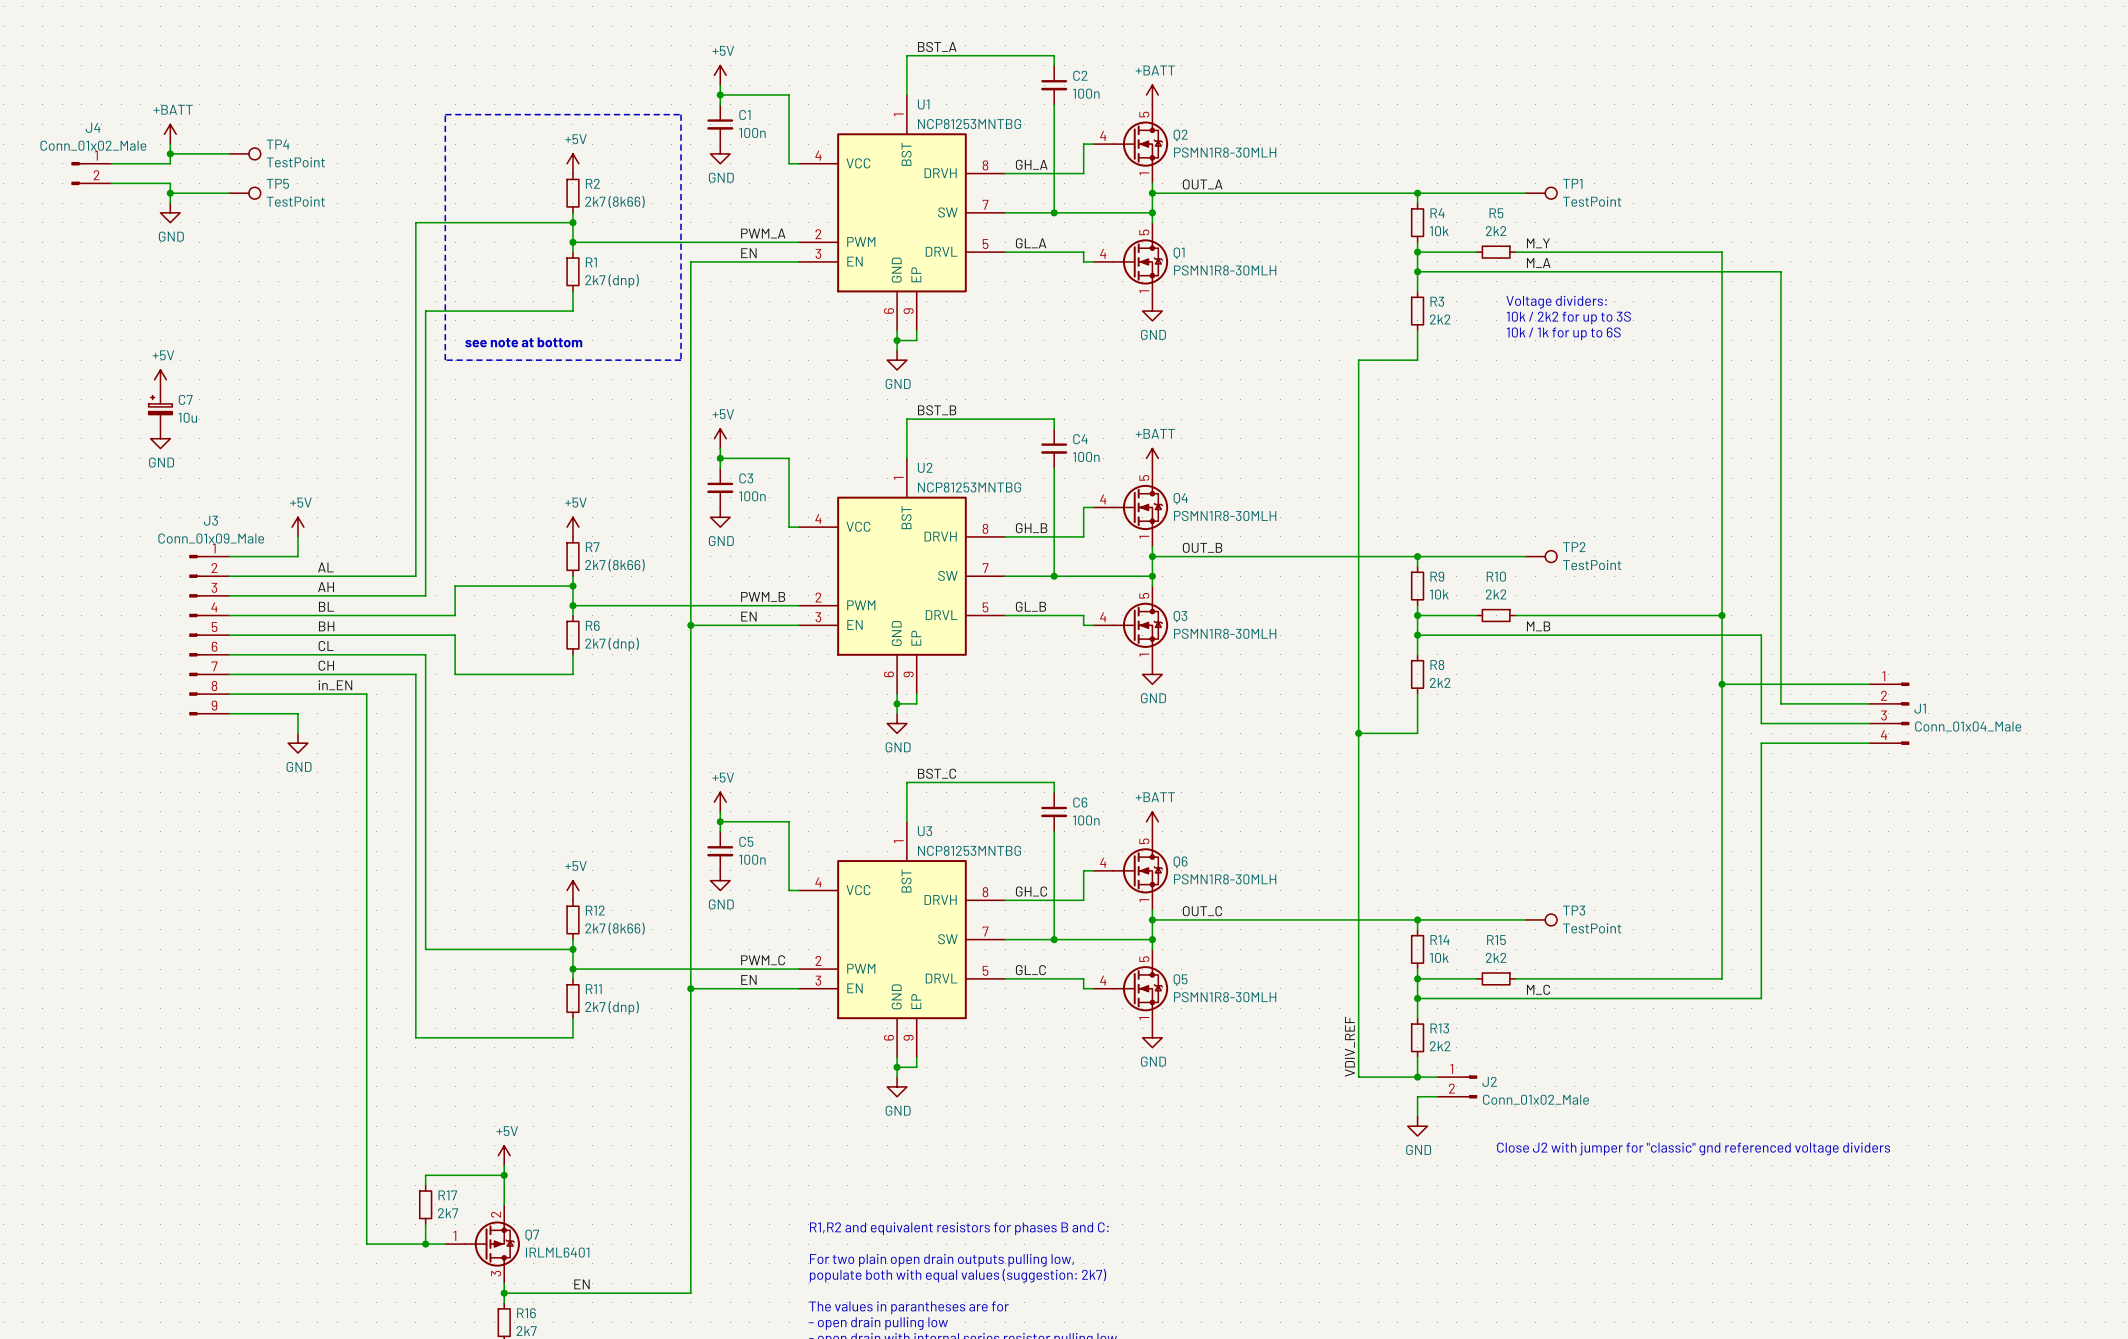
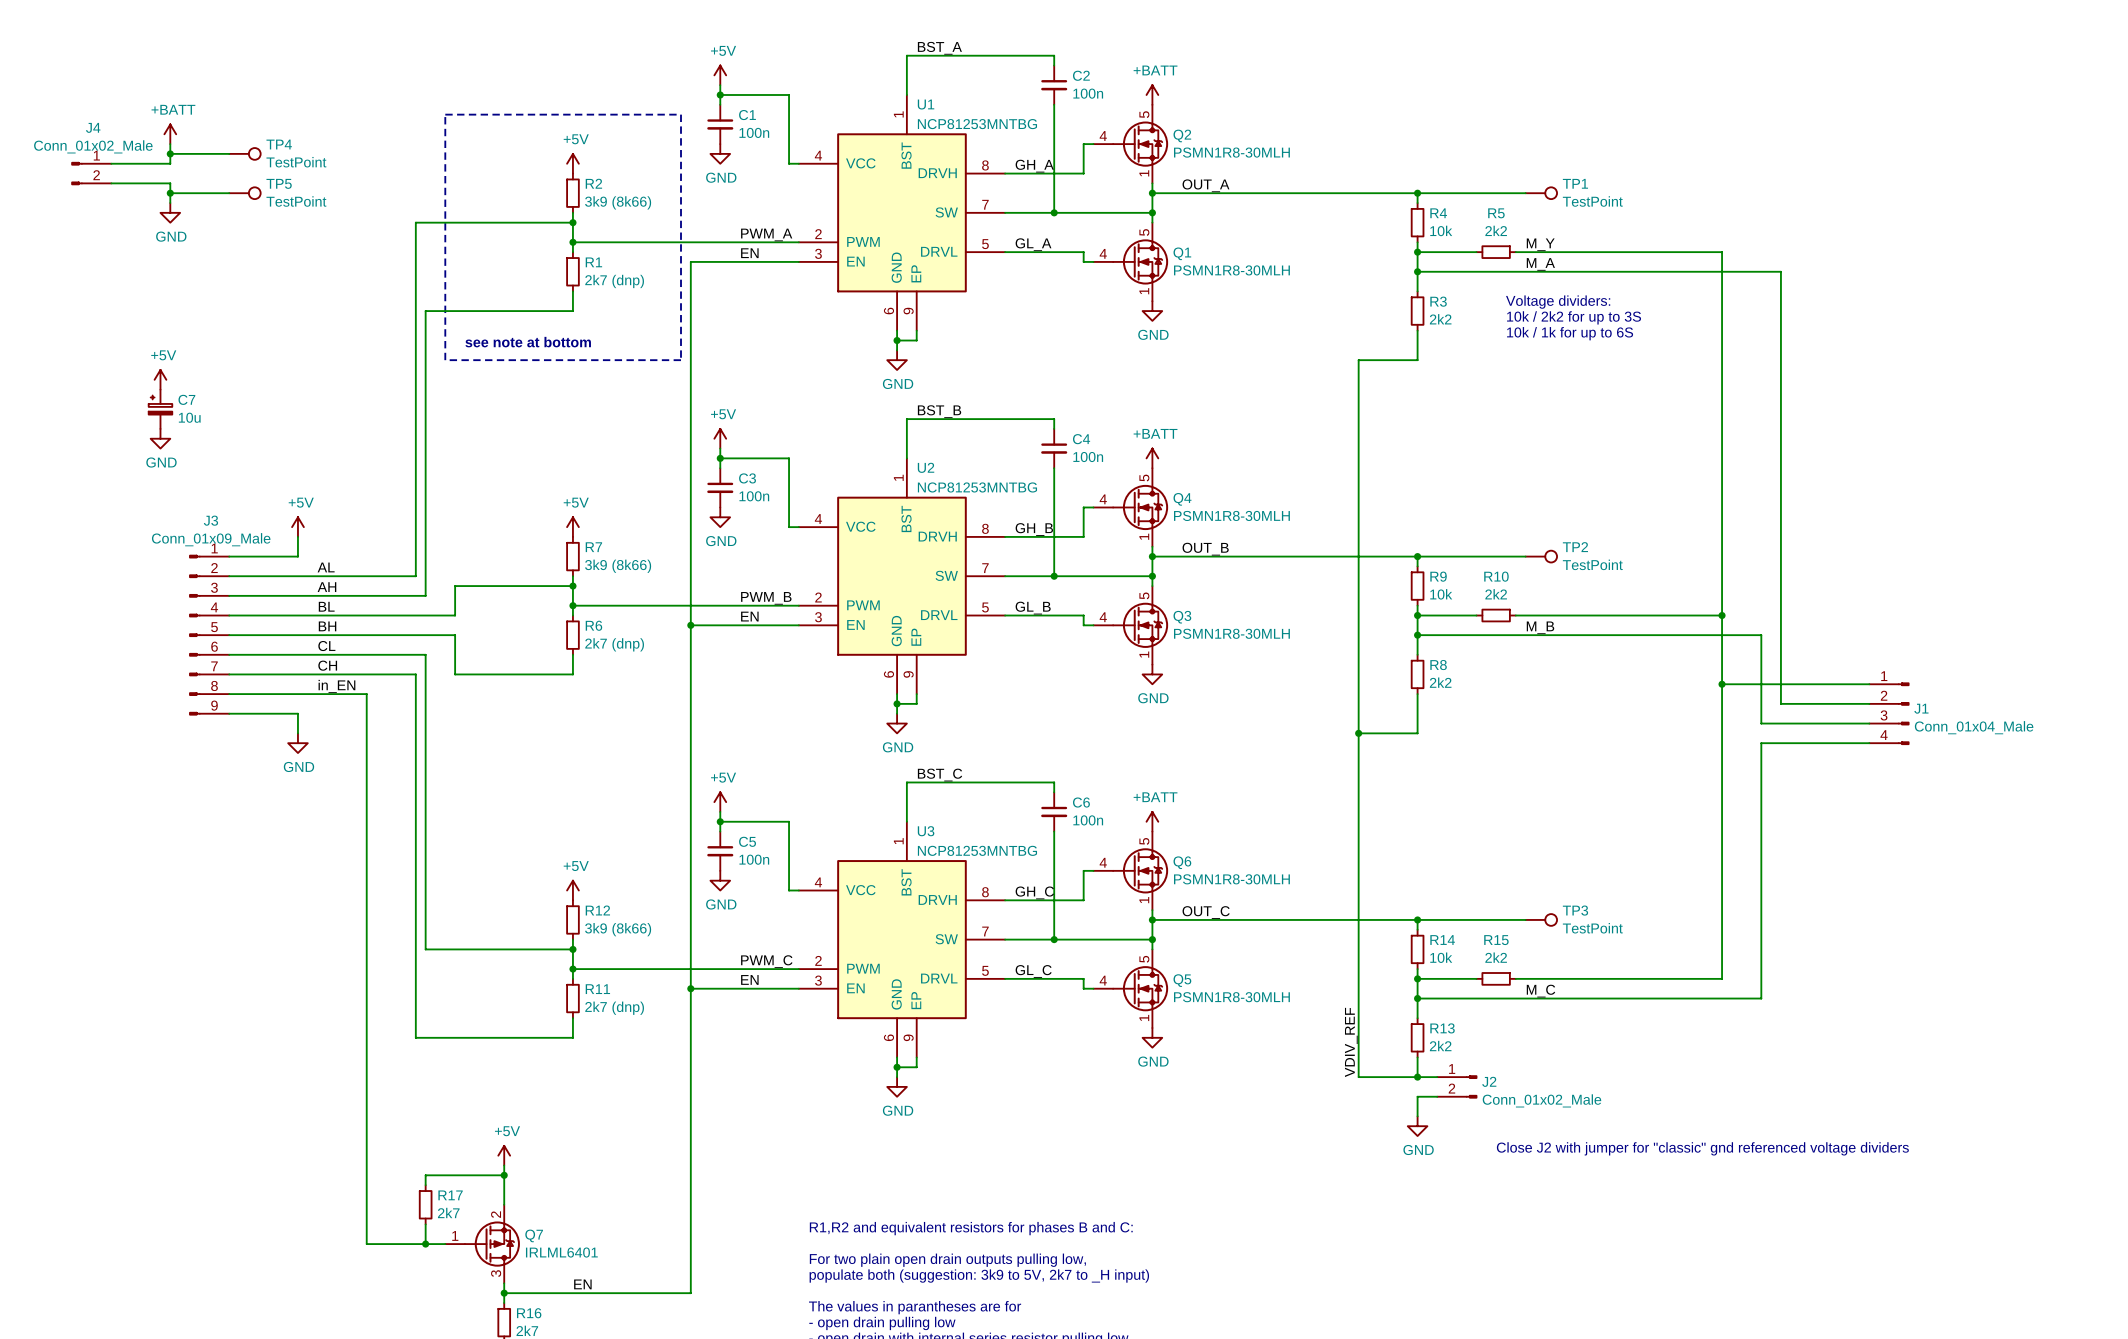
R2 value: 2k7 (8k66) (615, 201) -> 3k9 (8k66) (618, 202)
R7 value: 2k7 (8k66) (615, 565) -> 3k9 (8k66) (618, 566)
R12 value: 2k7 (8k66) (615, 928) -> 3k9 (8k66) (618, 929)
text: populate both with equal values (suggestion: 2k7) (958, 1275) -> populate both (suggestion: 3k9 to 5V, 2k7 to _H input) (979, 1276)

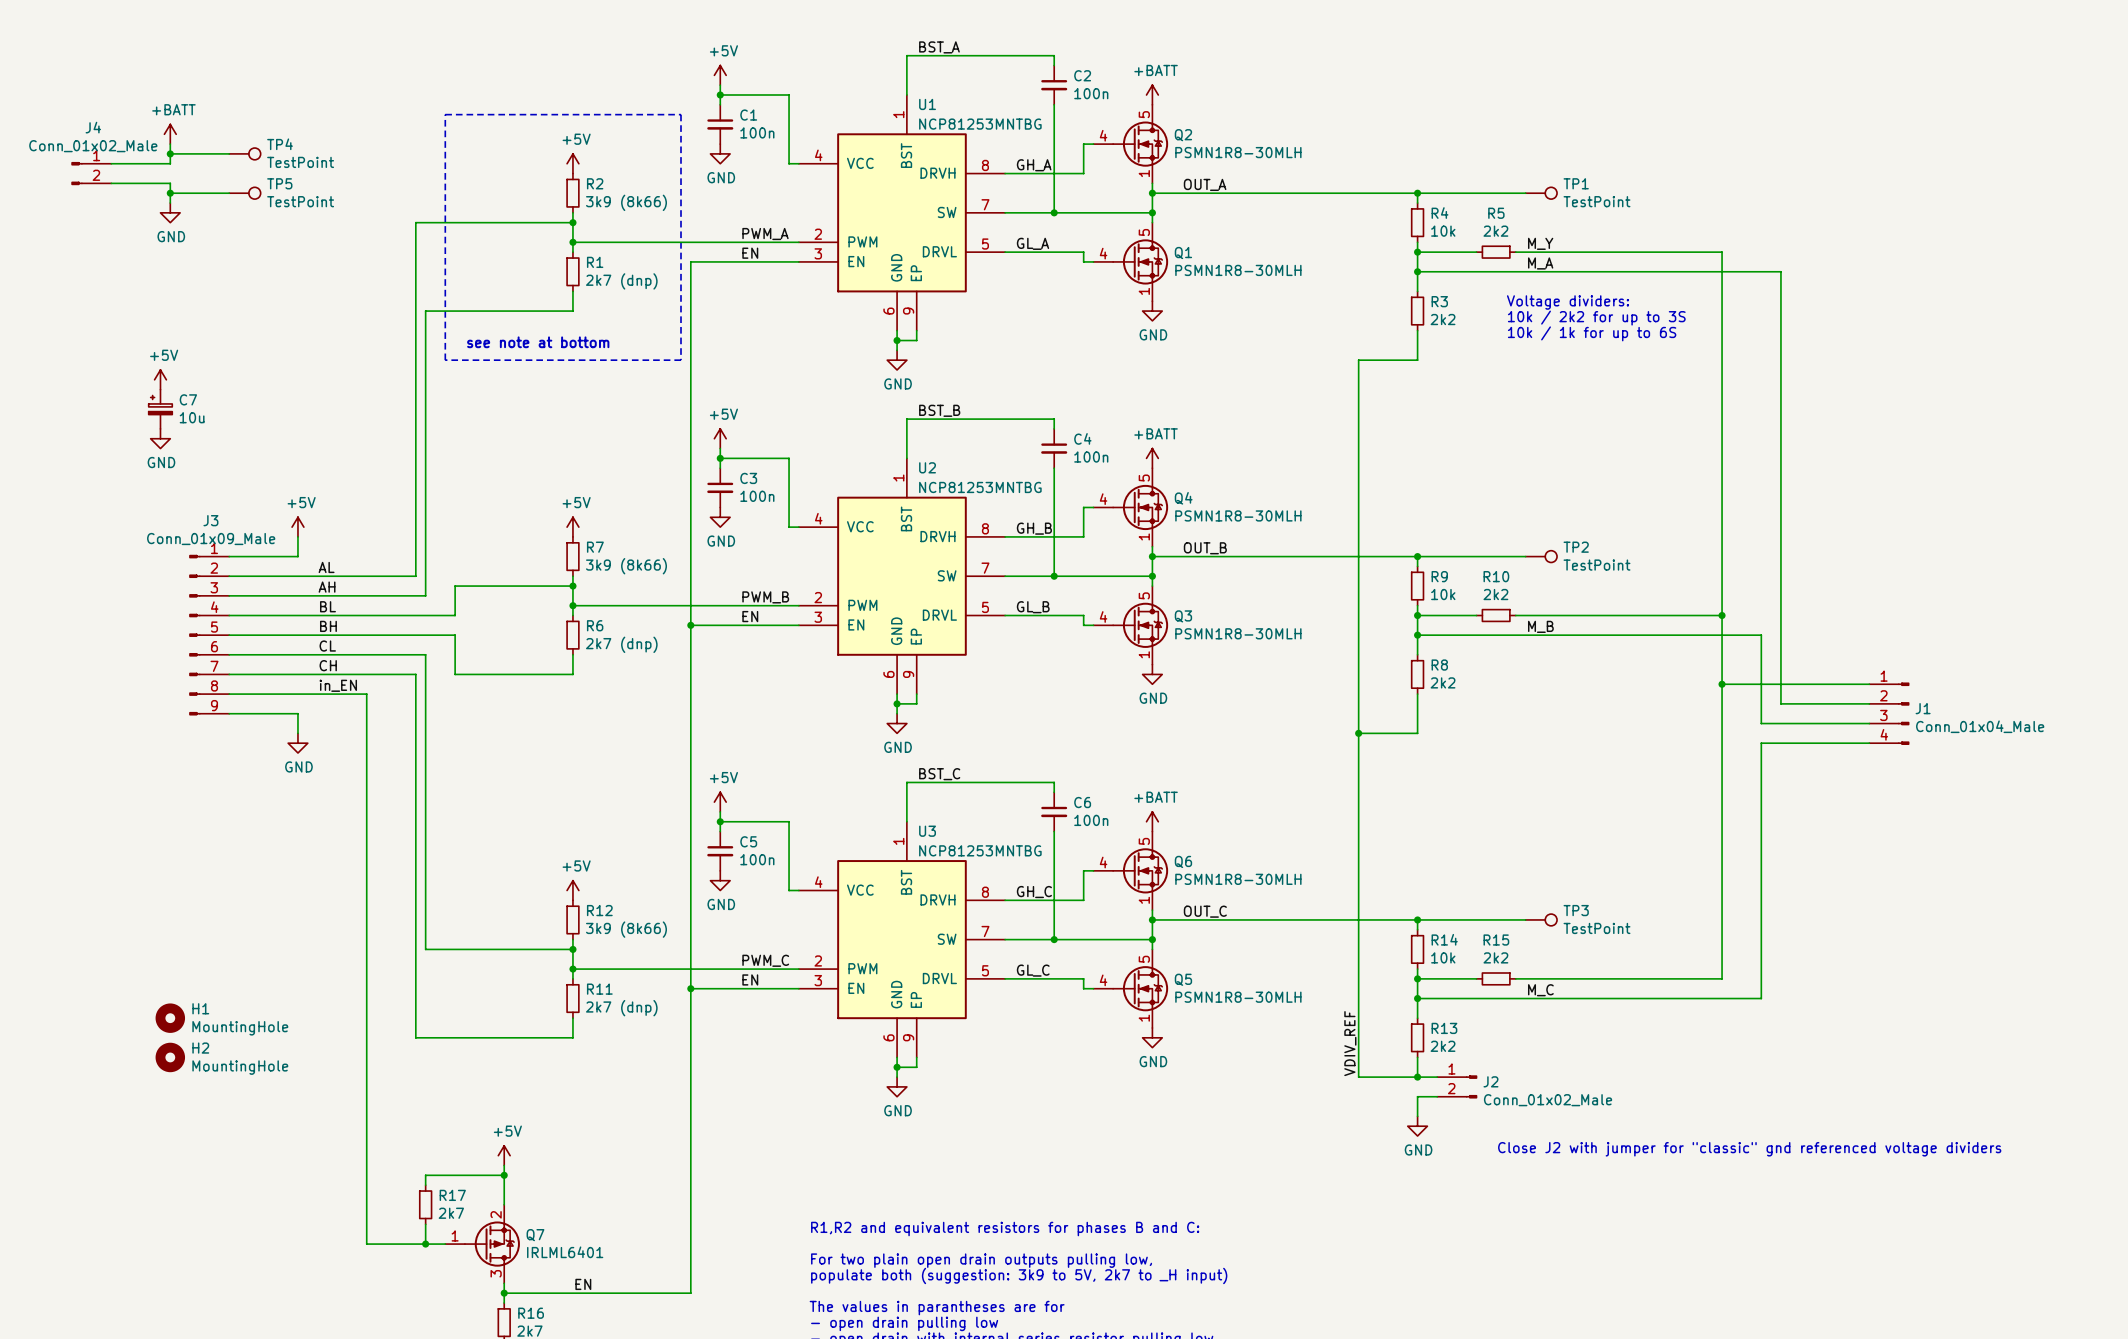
H1: none -> MountingHole (170, 1018)
H2: none -> MountingHole (170, 1057)

